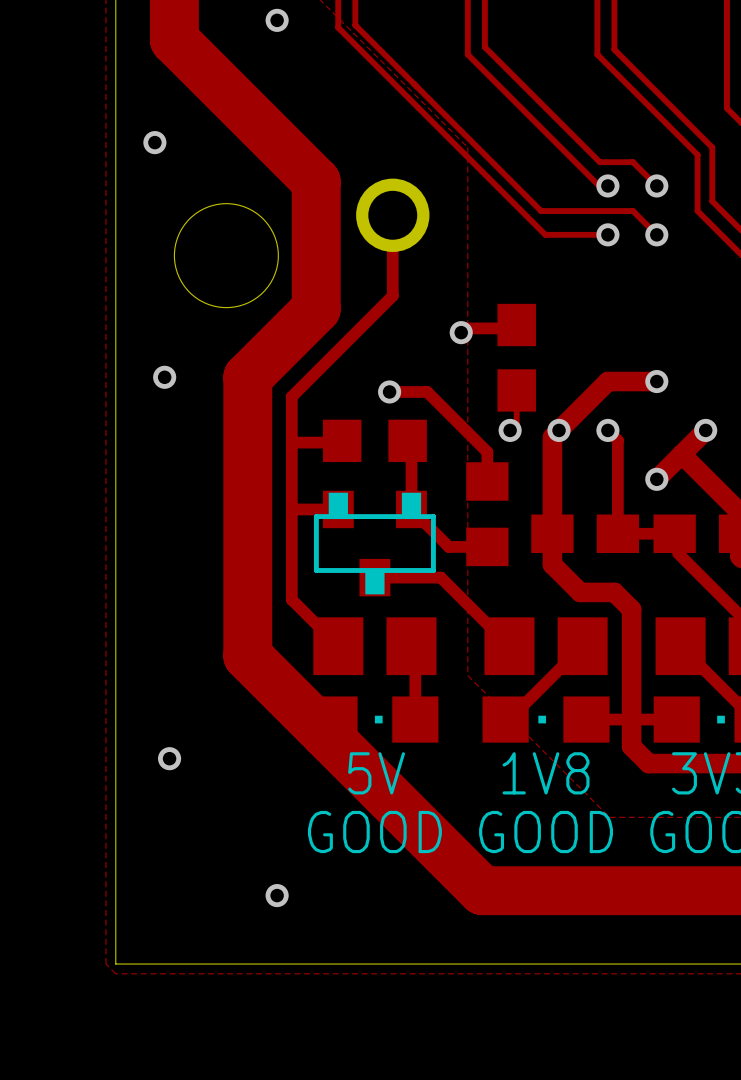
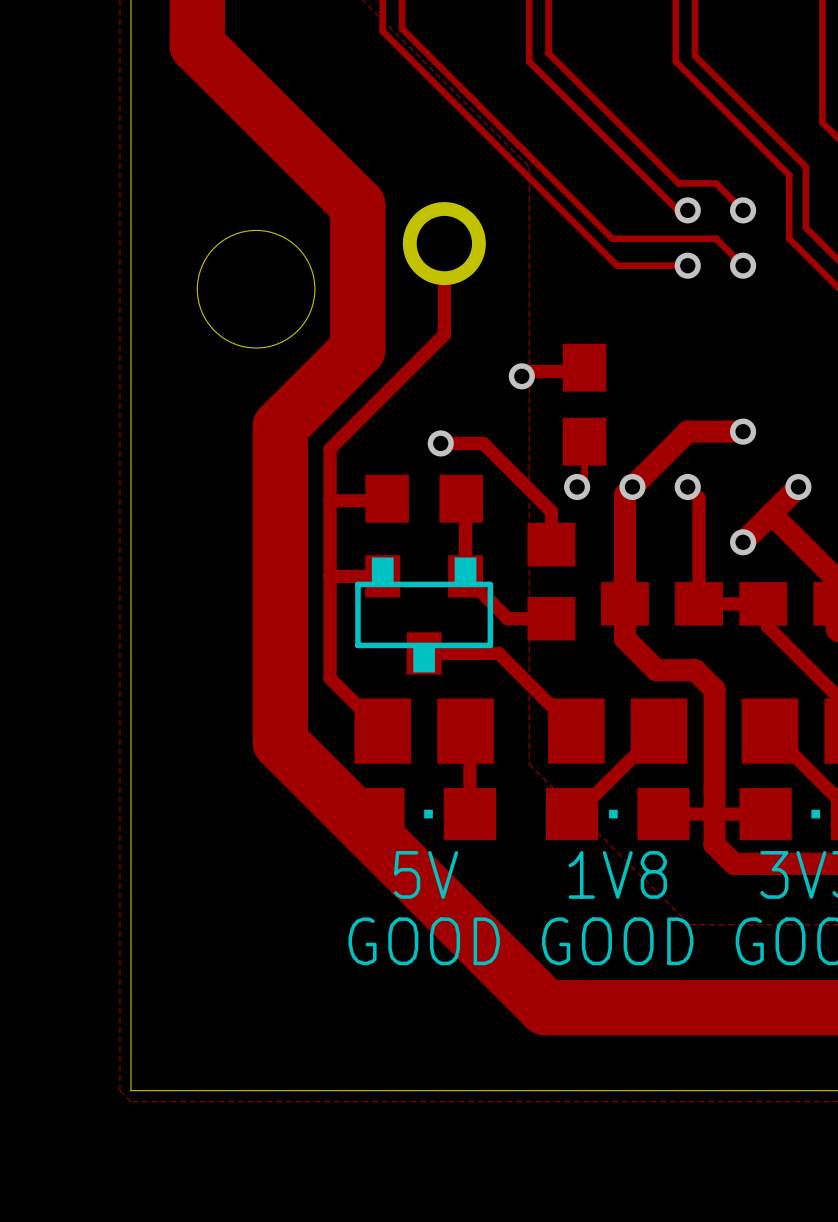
via: (277, 20) -> none
via: (154, 142) -> none
via: (164, 377) -> none
via: (169, 758) -> none
via: (277, 895) -> none

